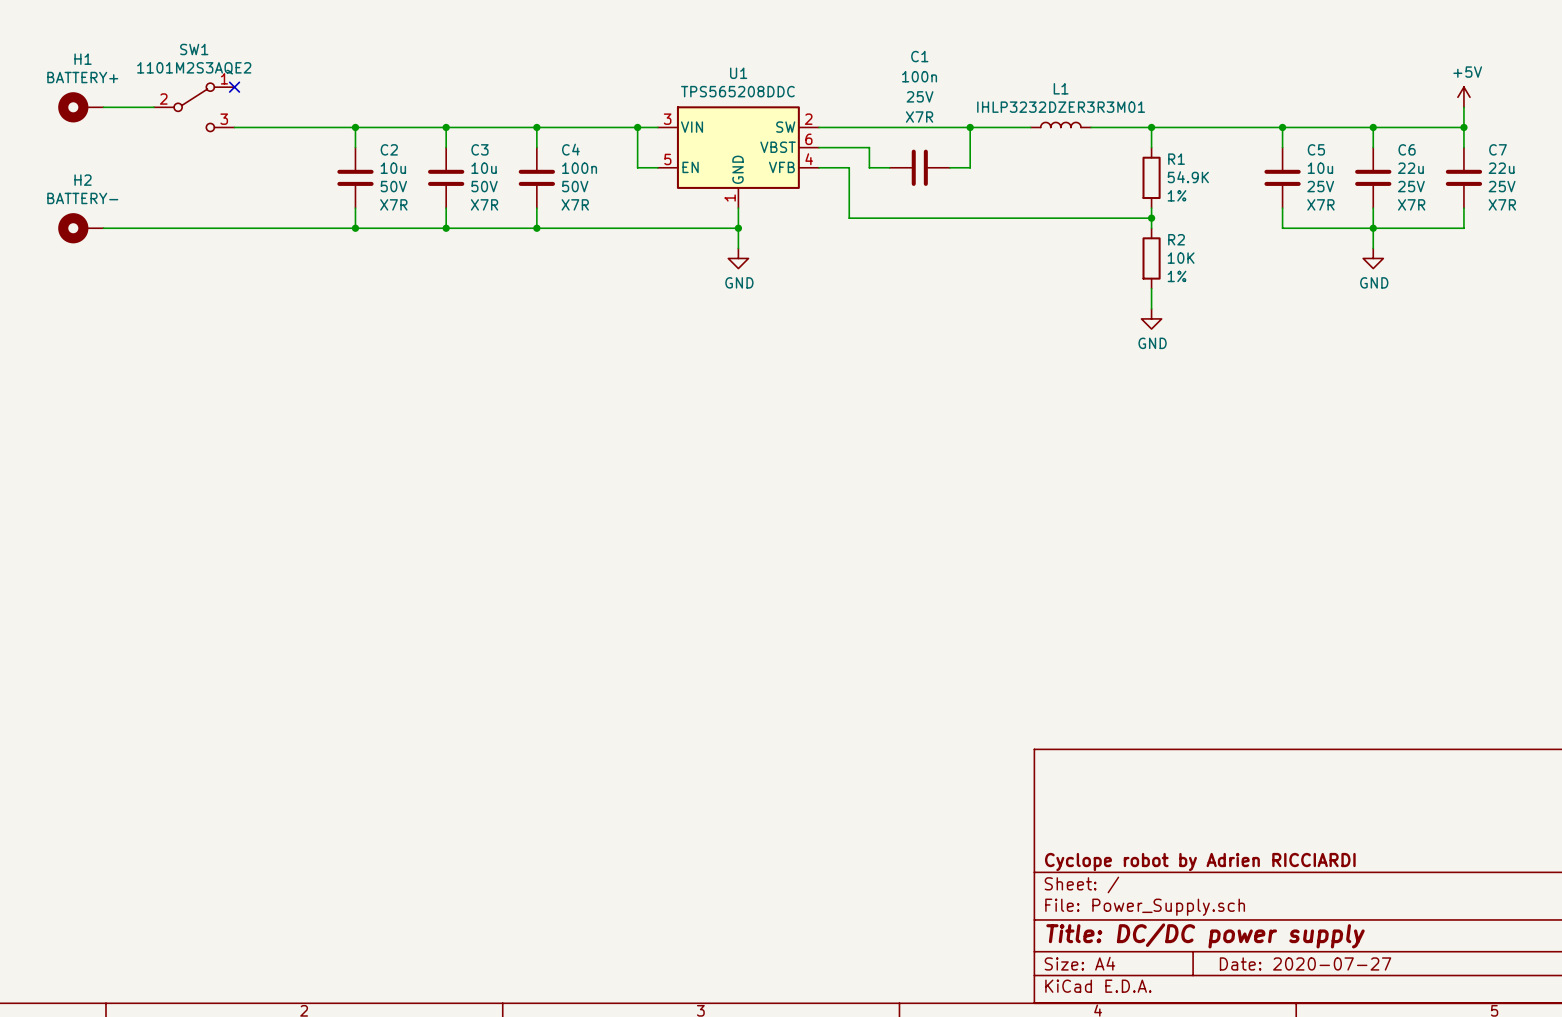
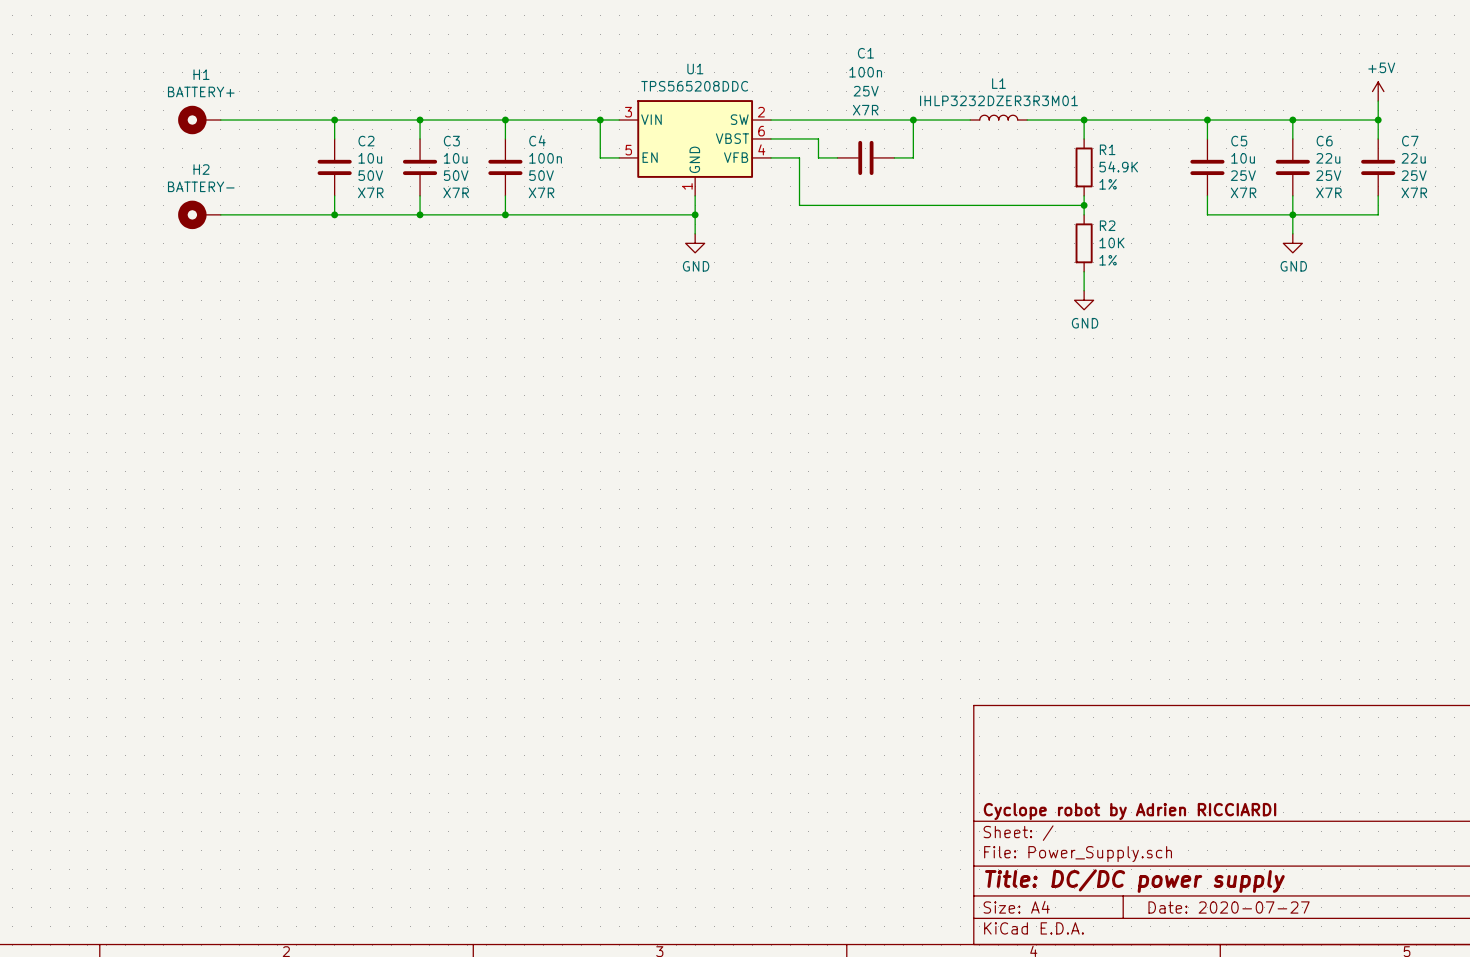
no-connect mark: (234, 87) -> none
H1 position: (80, 107) -> (199, 120)
wire: (103, 107) (153, 107) -> none
SW1: 1101M2S3AQE2 (194, 107) -> none
H2 position: (80, 228) -> (199, 214)
wire: (103, 228) (234, 228) -> none

